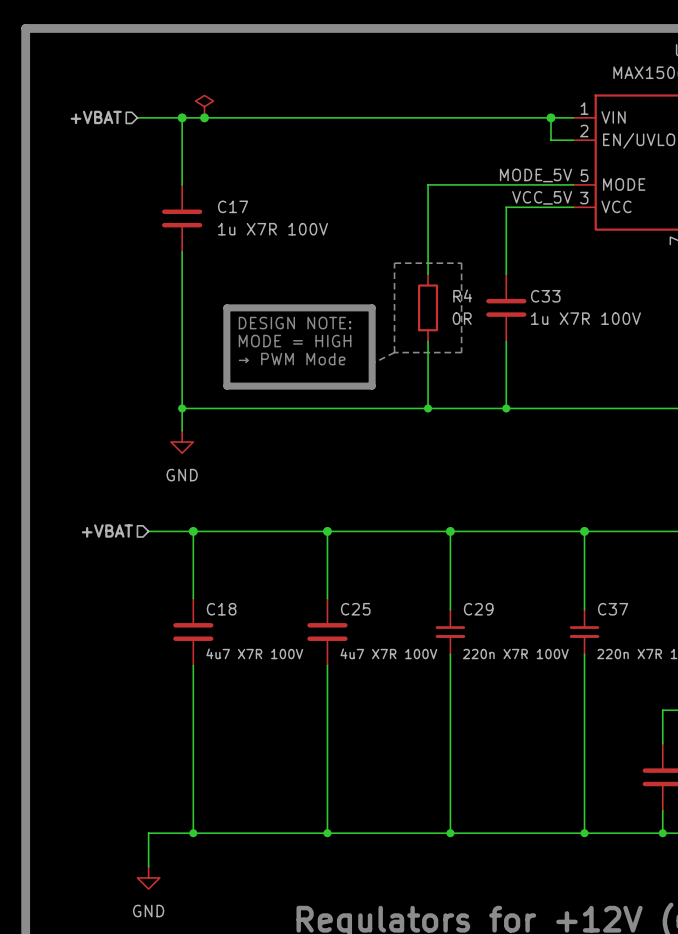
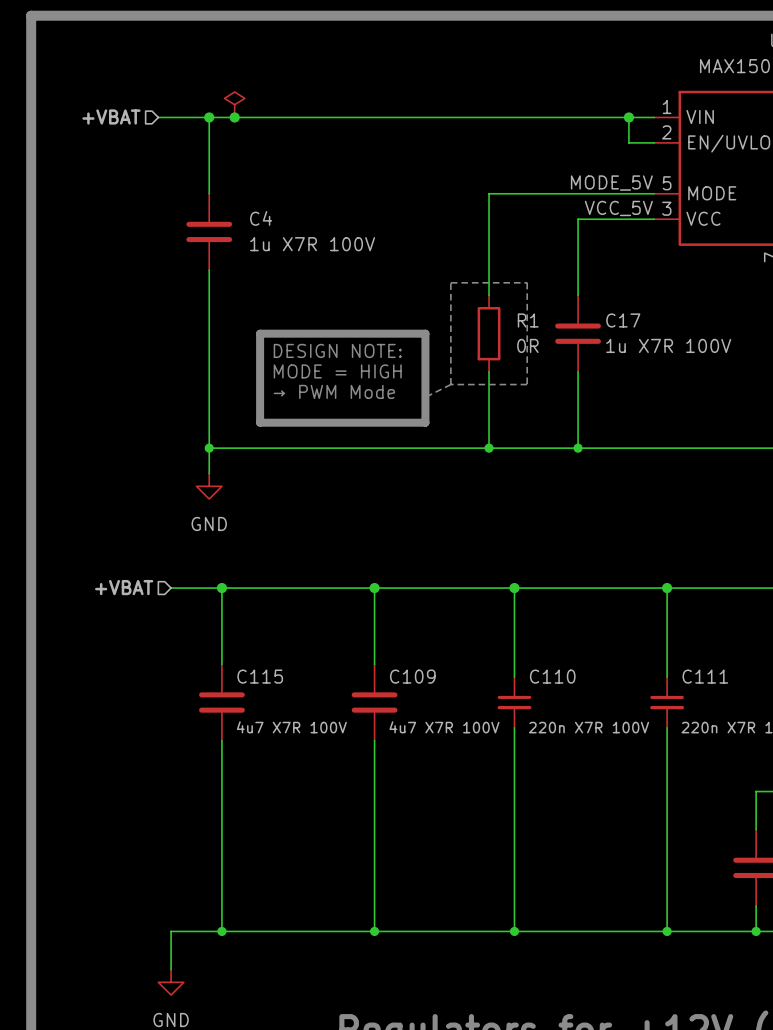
C17 name: C17 (233, 206) -> C4 (261, 218)
R4 name: R4 (462, 296) -> R1 (528, 320)
C33 name: C33 (545, 296) -> C17 (623, 320)
C18 name: C18 (221, 609) -> C115 (260, 676)
C25 name: C25 (355, 609) -> C109 (412, 676)
C29 name: C29 (478, 609) -> C110 (552, 676)
C37 name: C37 (613, 609) -> C111 (705, 676)

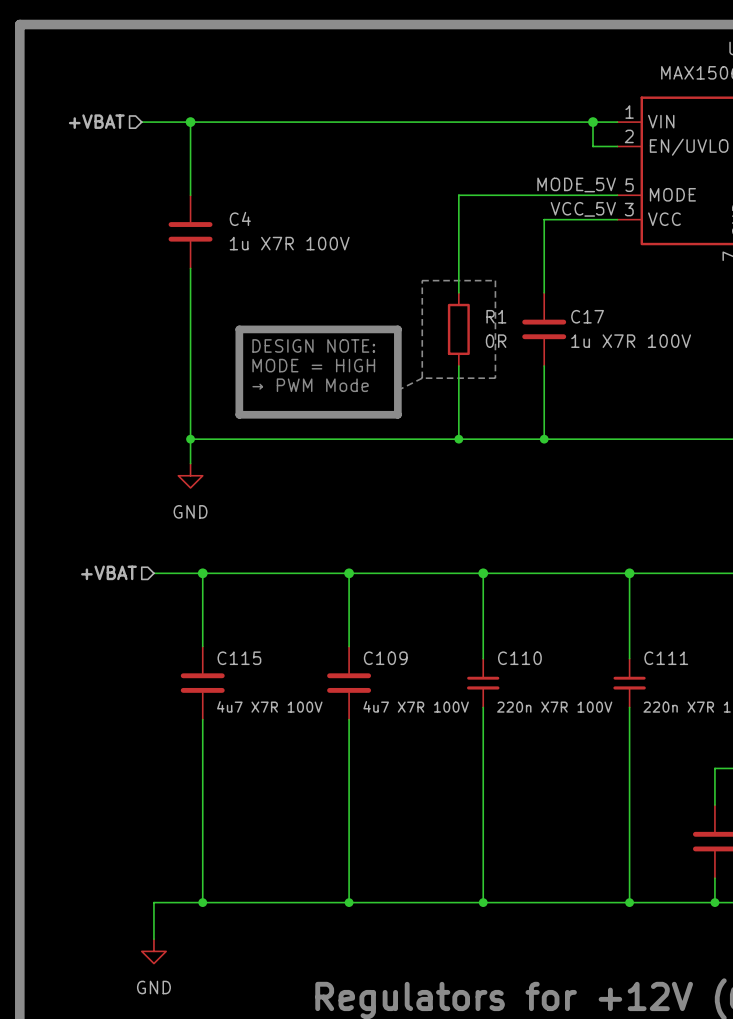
power symbol: (234, 104) -> none
junction: (234, 117) -> none

